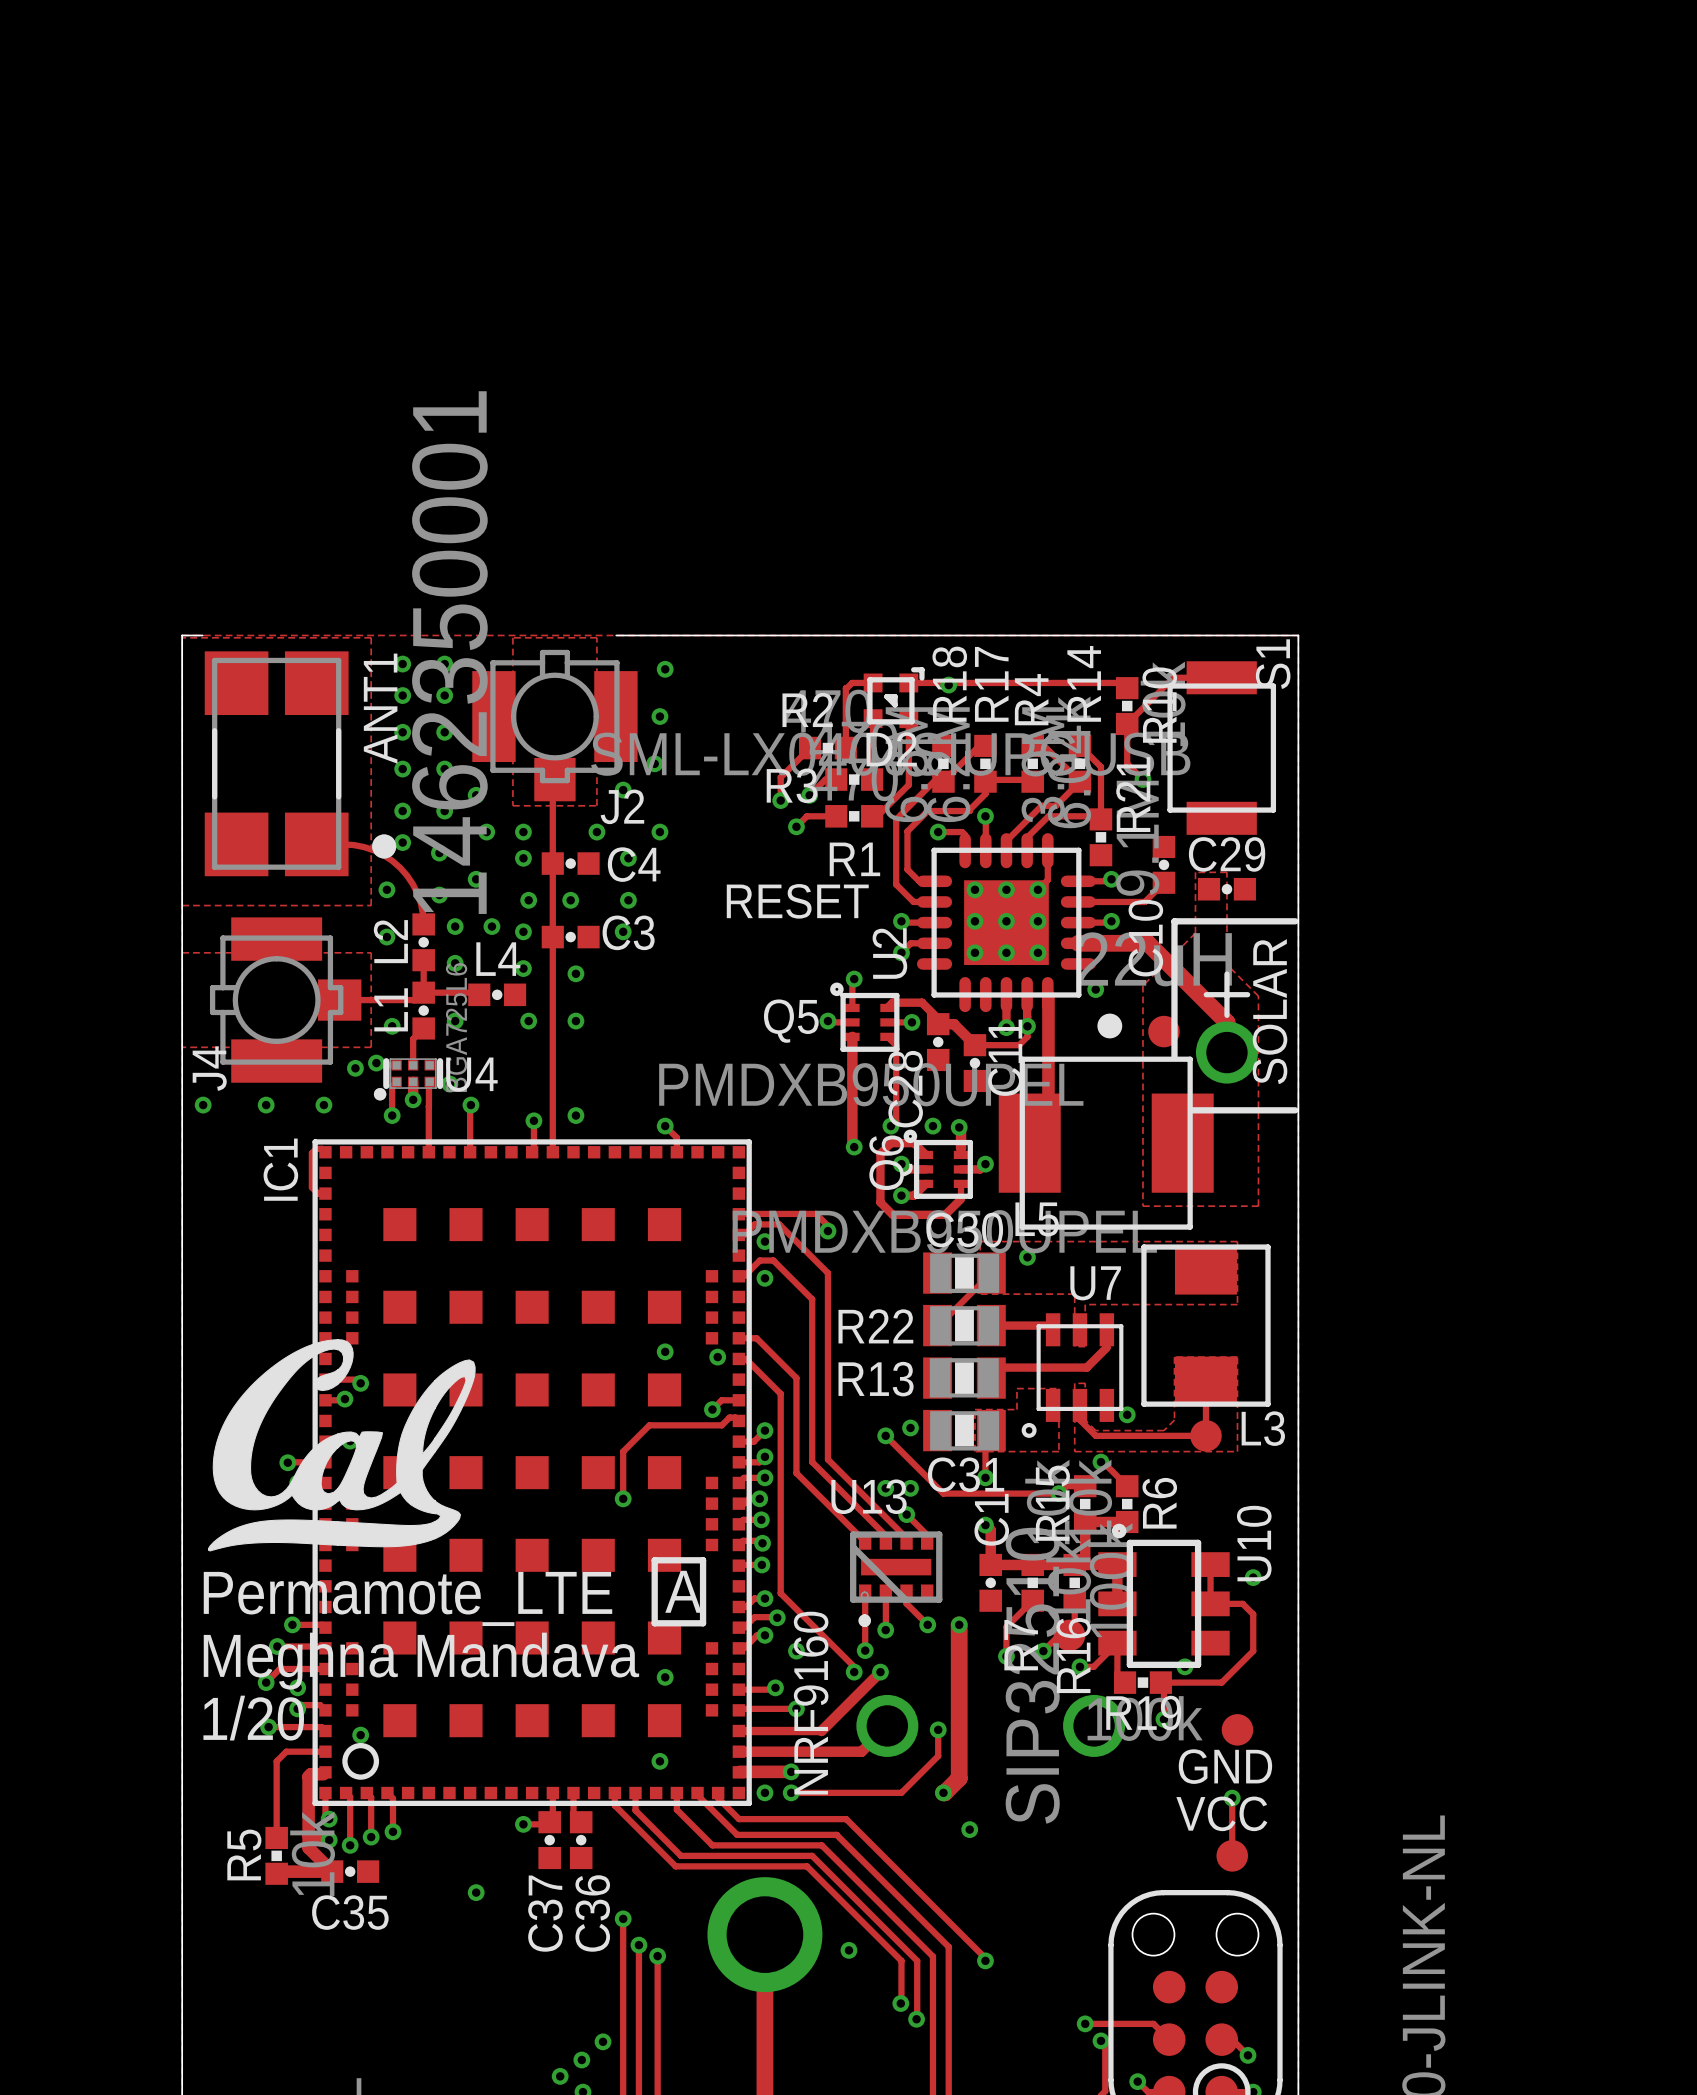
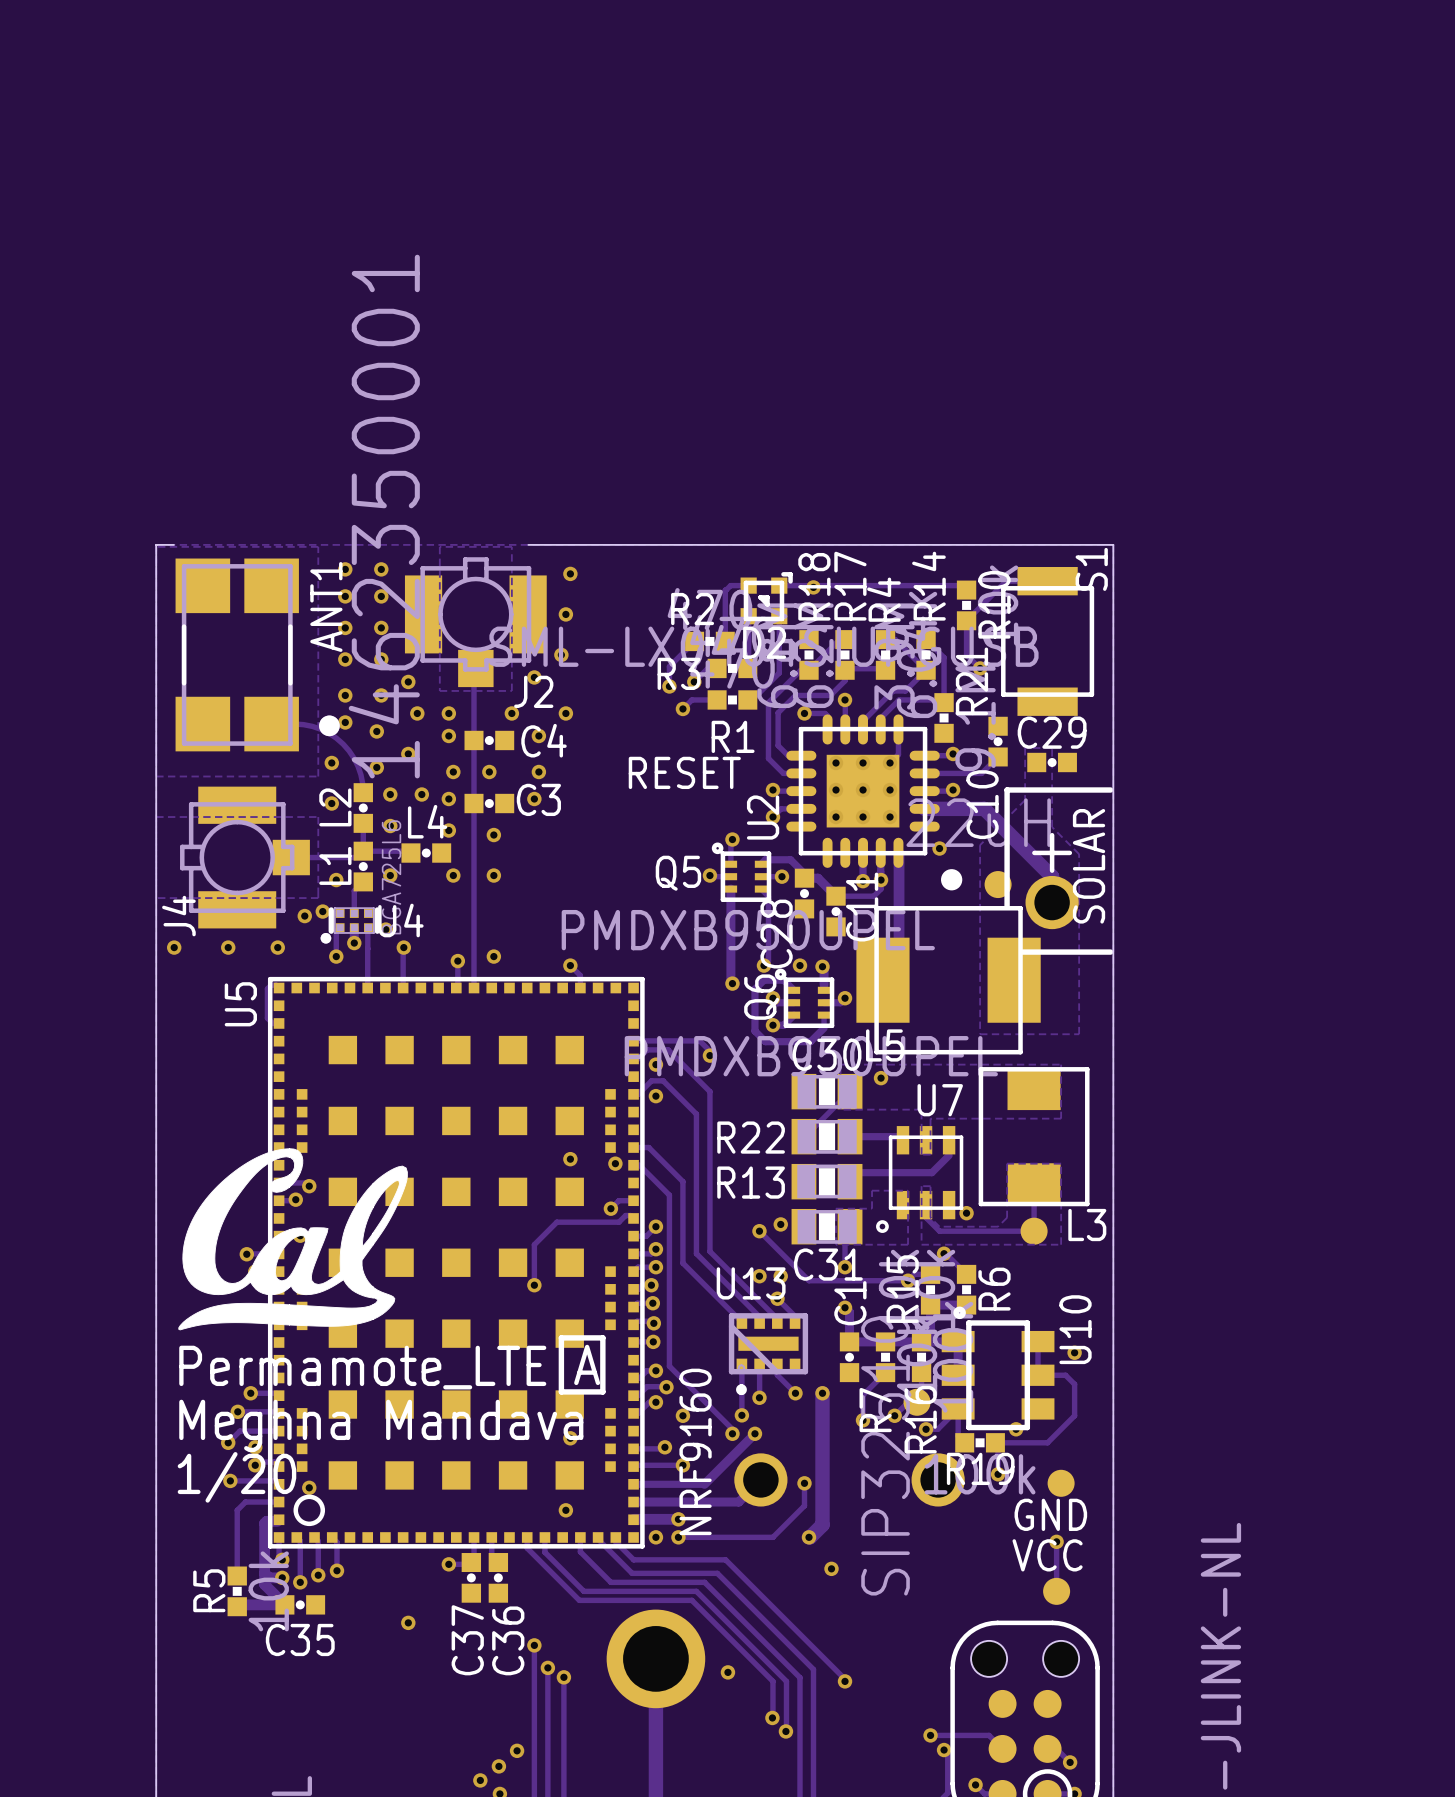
IC1 name: IC1 (280, 1169) -> U5 (240, 1004)

